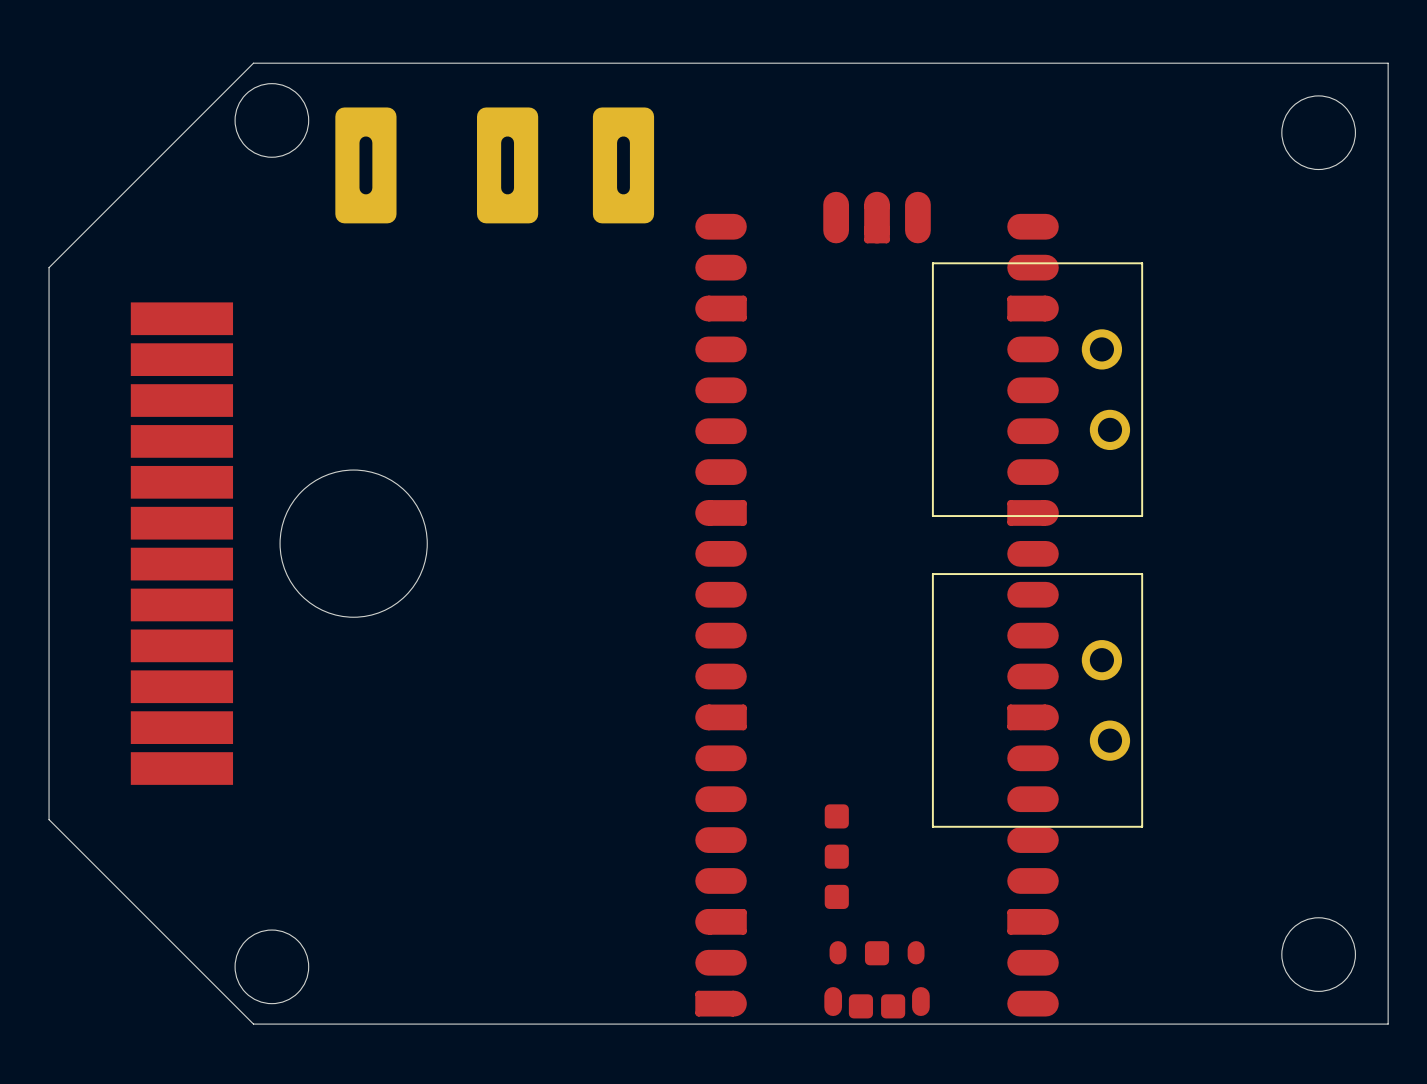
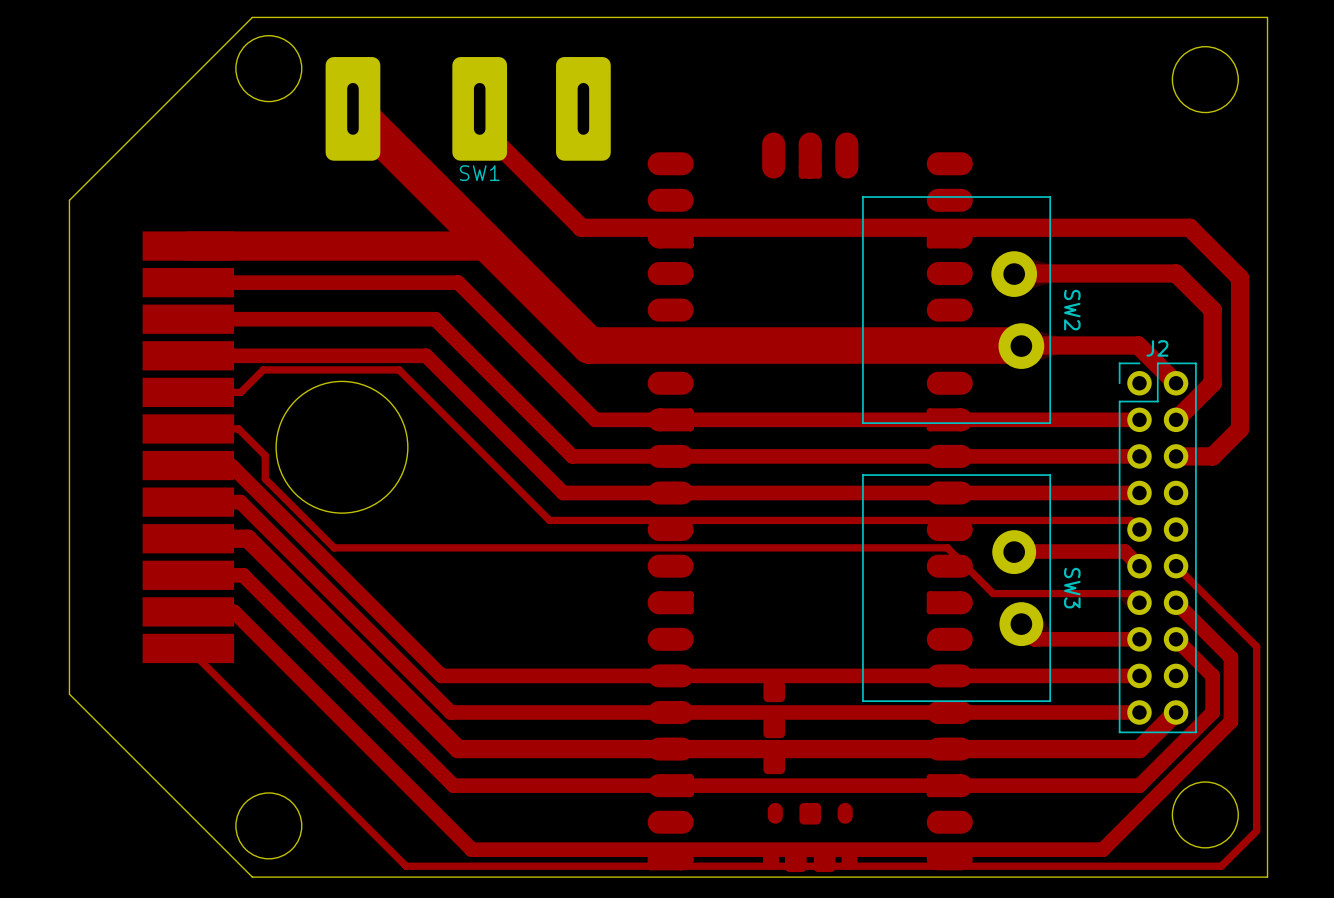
top track: none -> (352, 108) (589, 345) (1138, 345) (1176, 383)
top track: none -> (479, 108) (479, 125) (581, 227) (1189, 227) (1240, 278) (1240, 428) (1212, 456) (1176, 456)
top track: none -> (490, 246) (188, 246)
top track: none -> (1011, 273) (1176, 273) (1212, 310) (1212, 383) (1176, 419)
top track: none -> (188, 282) (458, 282) (595, 419) (1139, 419)
part: (1037, 389) -> none
SW2: none -> (956, 310)
top track: none -> (188, 319) (435, 319) (572, 456) (1139, 456)
top track: none -> (188, 355) (426, 355) (563, 492) (1139, 492)
top track: none -> (188, 392) (240, 392) (263, 369) (399, 369) (549, 520) (1130, 520) (1139, 529)
top track: none -> (224, 428) (238, 428) (265, 455) (265, 479) (334, 547) (947, 547) (993, 593) (1130, 593) (1139, 602)
top track: none -> (188, 465) (231, 465) (441, 675) (1139, 675)
top track: none -> (188, 502) (240, 502) (450, 712) (1139, 712)
top track: none -> (188, 538) (247, 538) (458, 749) (1139, 749) (1176, 712)
J2: none -> (1157, 547)
top track: none -> (1011, 551) (1124, 551) (1139, 566)
top track: none -> (1176, 566) (1256, 646) (1256, 830) (1221, 866) (406, 866) (188, 648) (224, 648)
top track: none -> (188, 575) (243, 575) (453, 785) (1139, 785) (1212, 712) (1212, 675) (1176, 639)
part: (1037, 700) -> none
SW3: none -> (956, 588)
top track: none -> (1176, 602) (1230, 657) (1230, 721) (1102, 849) (471, 849) (234, 611) (188, 611)
top track: none -> (1018, 623) (1034, 639) (1139, 639)

